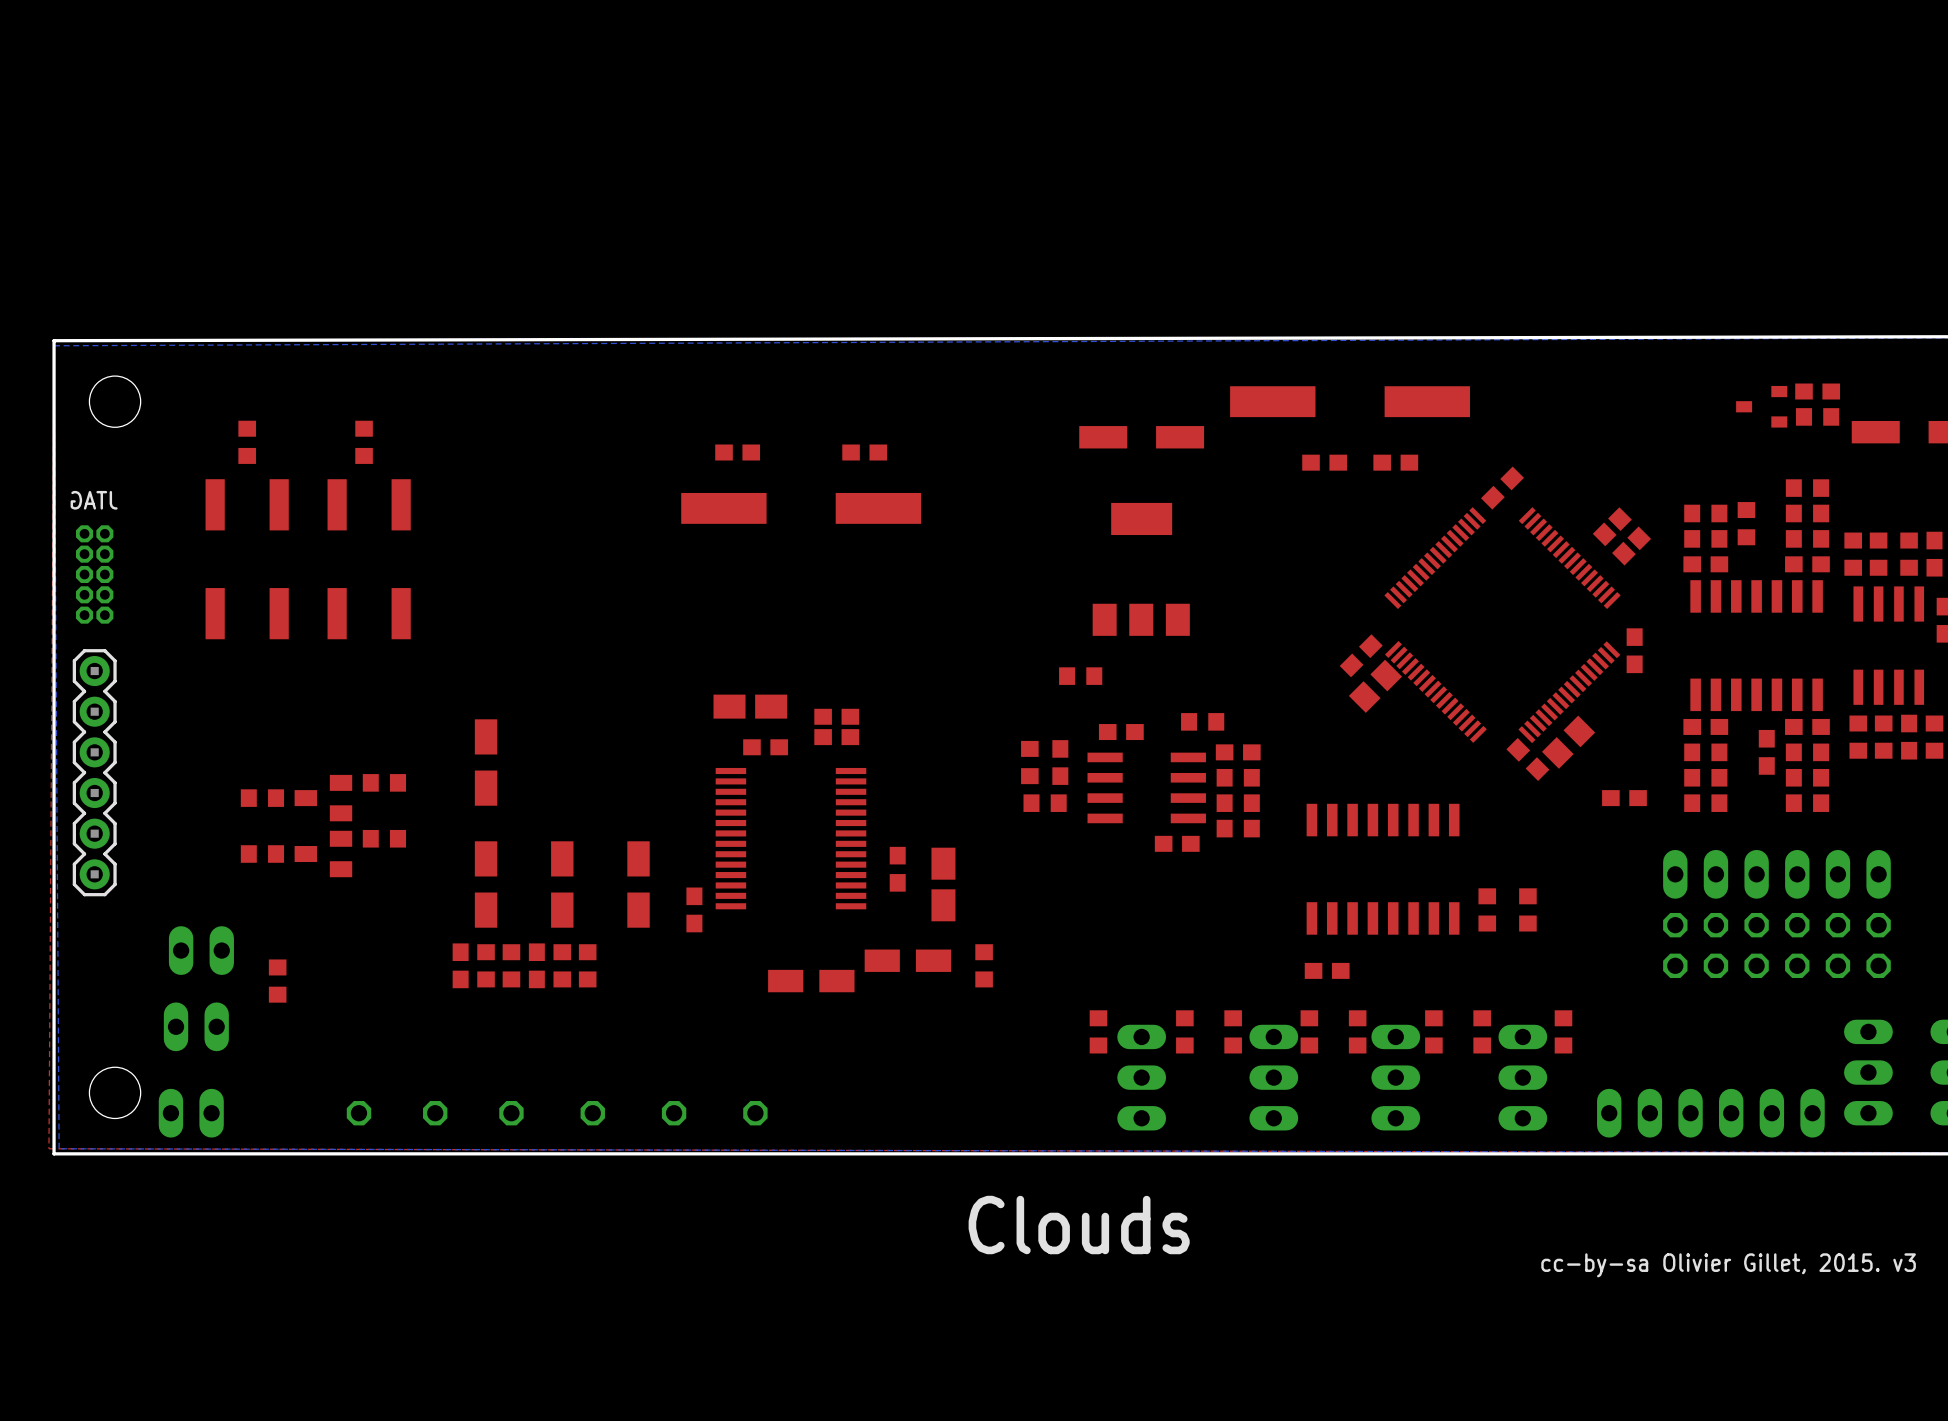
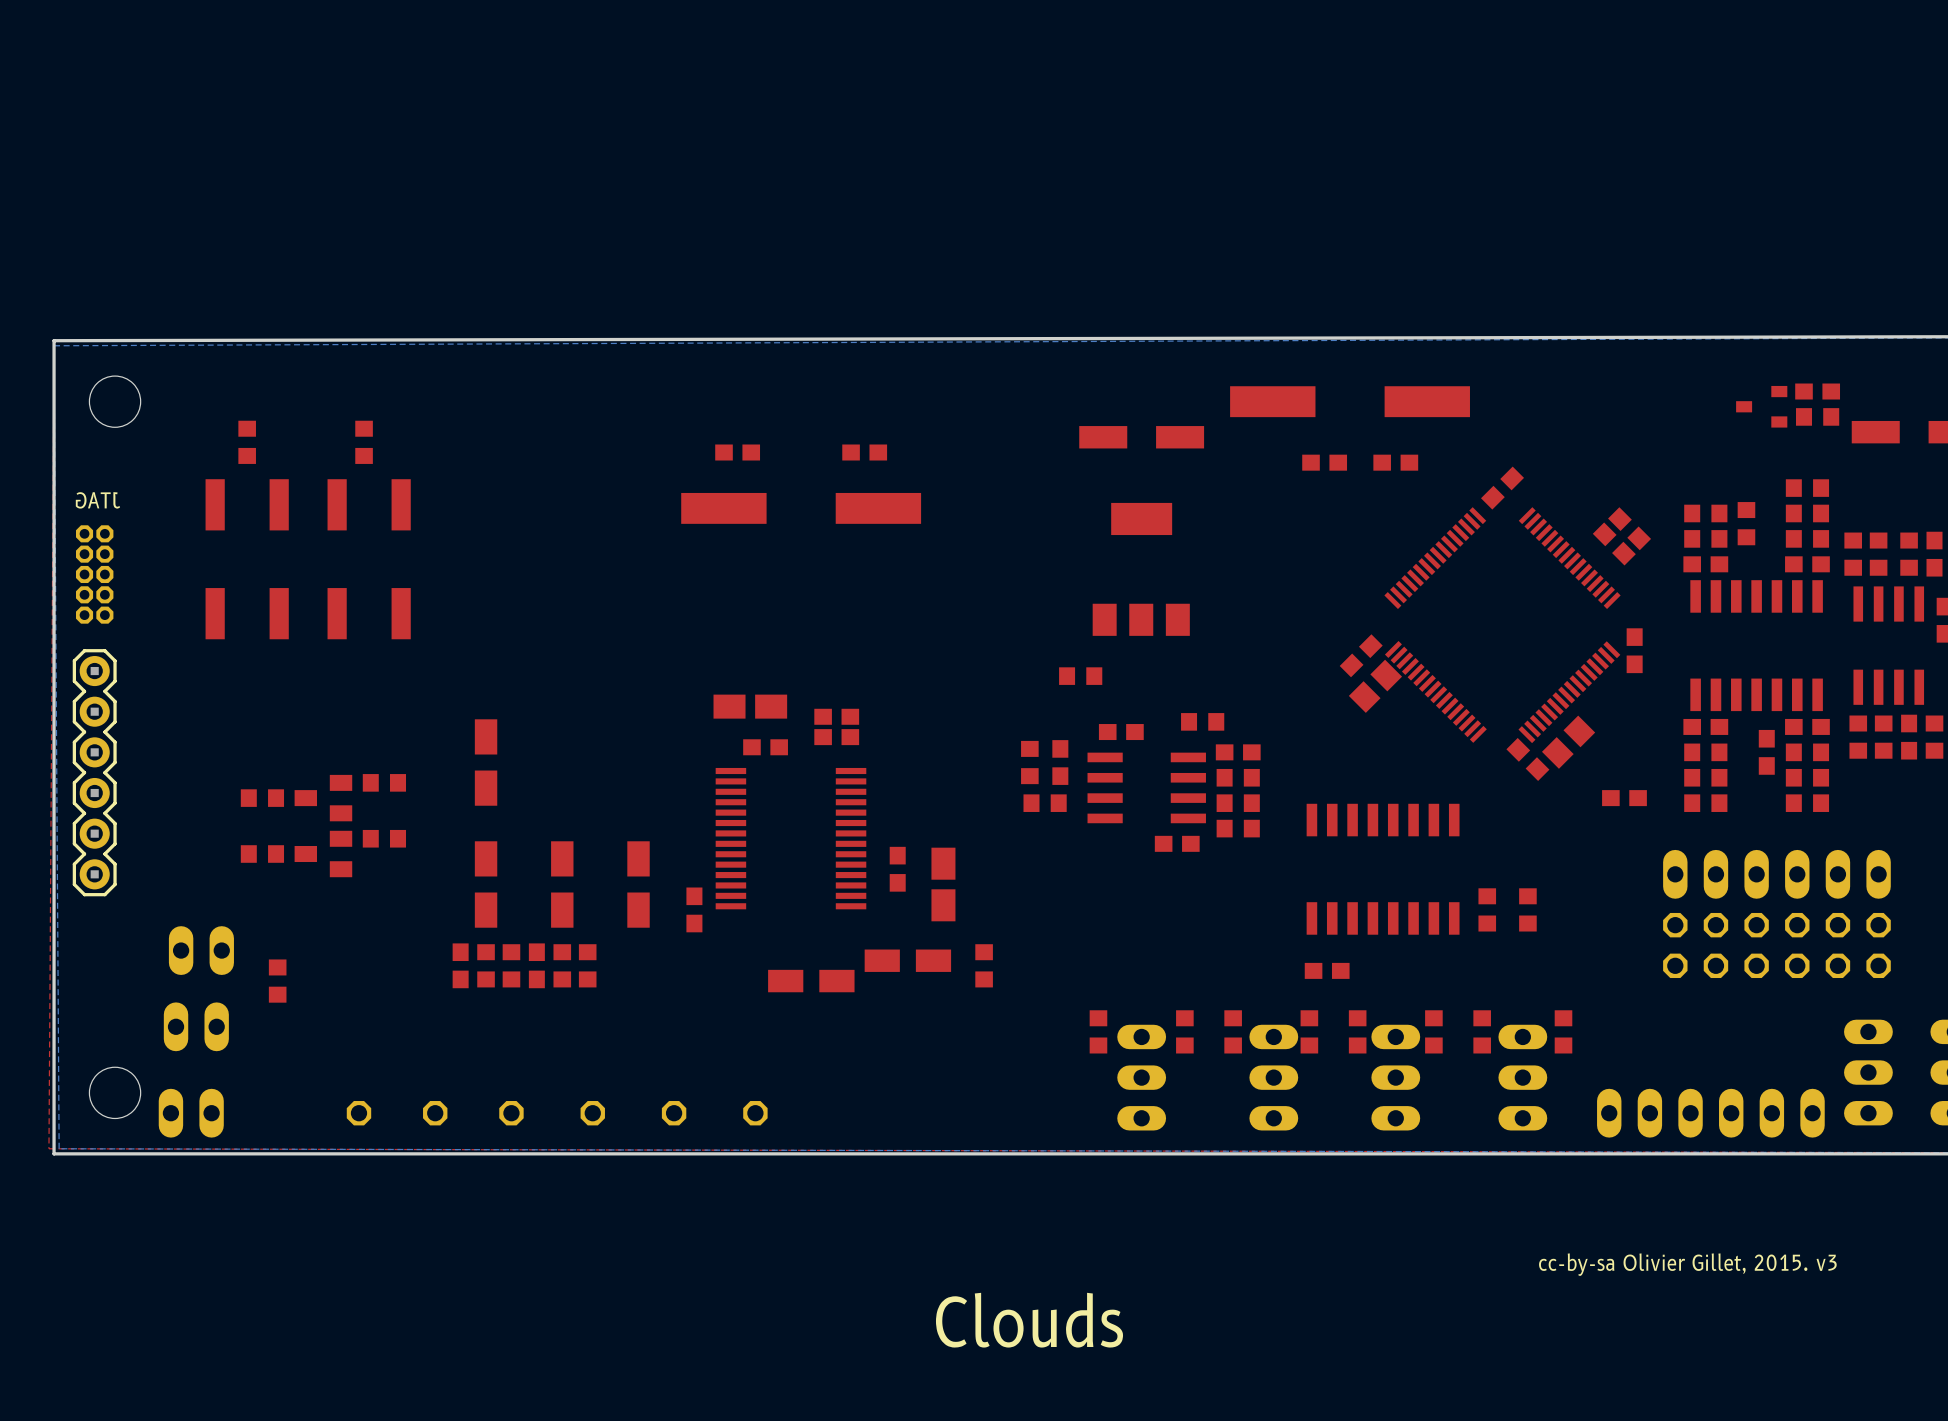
text position: Clouds (1079, 1225) -> Clouds (1029, 1320)

